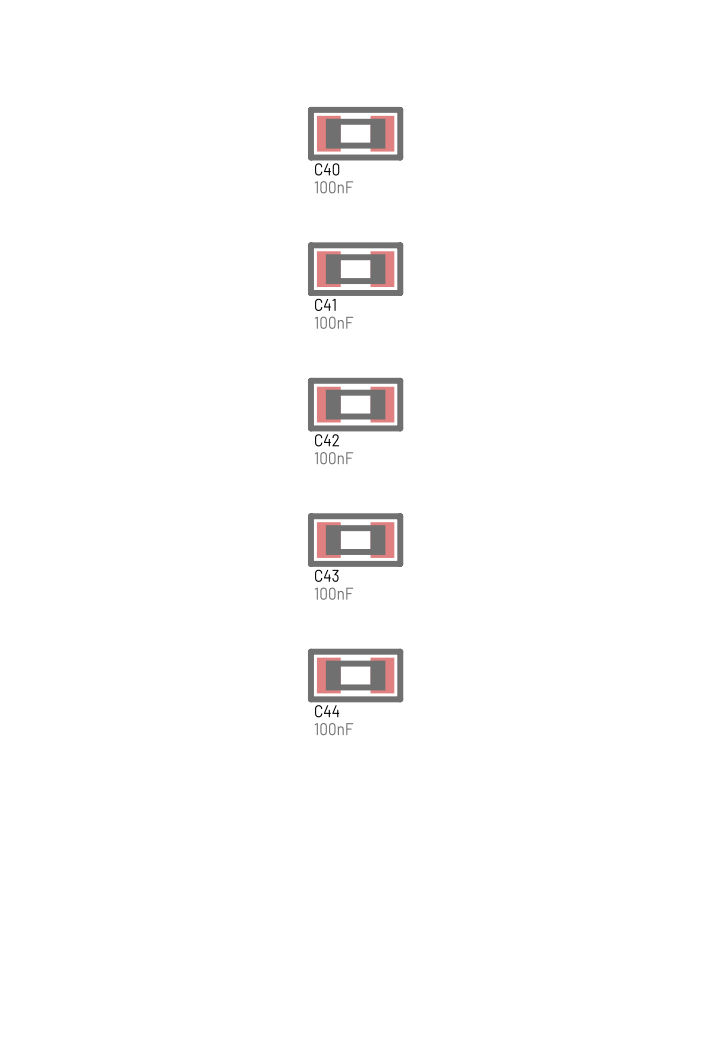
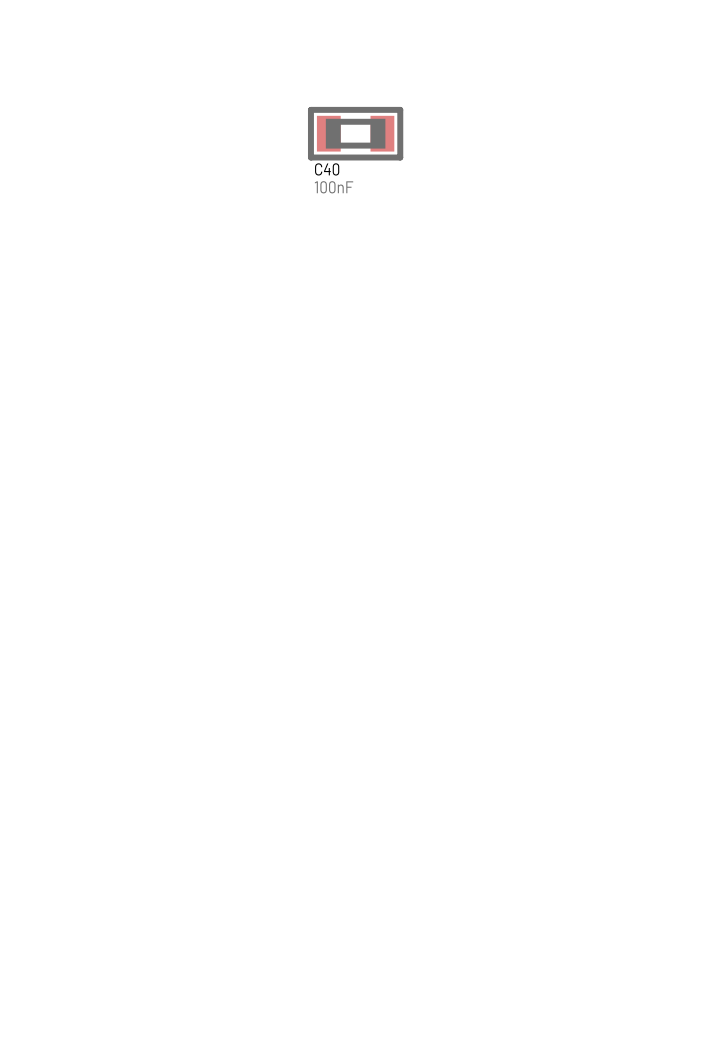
C41: 100nF (355, 269) -> none
C42: 100nF (355, 404) -> none
C43: 100nF (355, 540) -> none
C44: 100nF (355, 675) -> none

